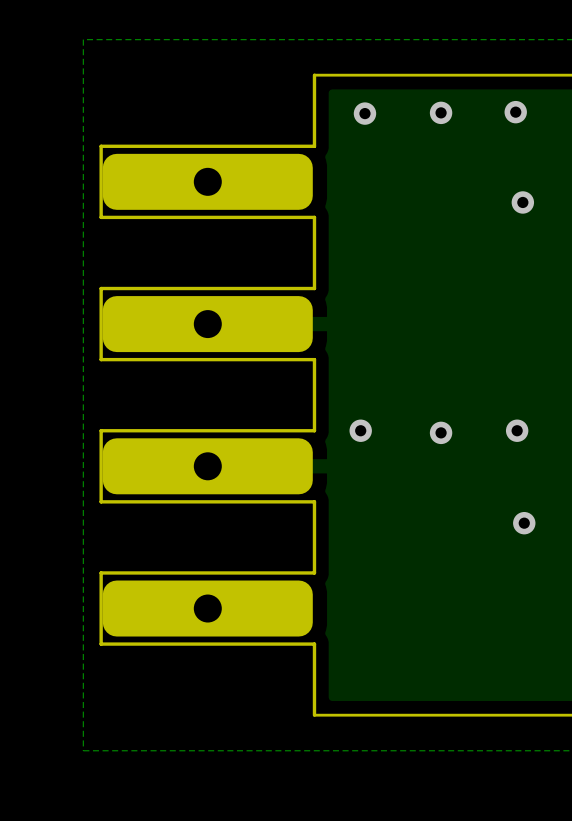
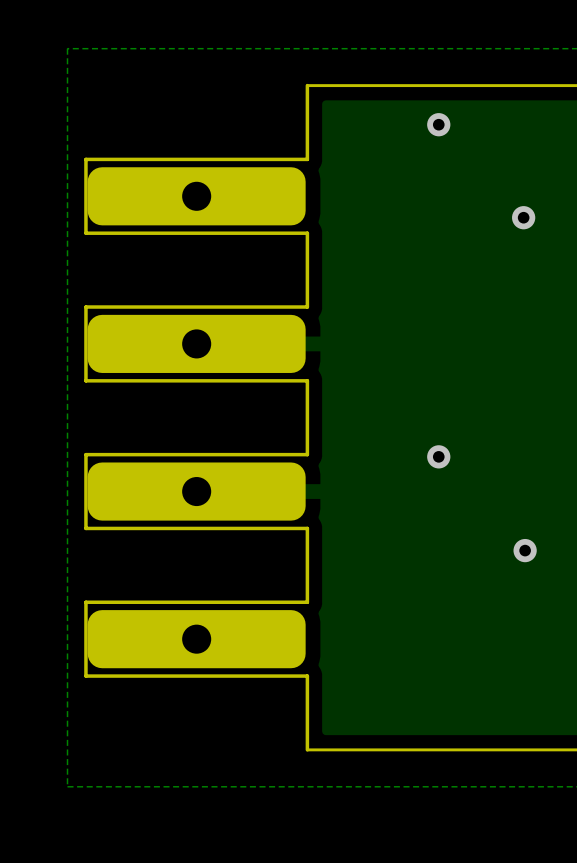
via: (515, 112) -> none
via: (364, 113) -> none
via: (360, 430) -> none
via: (517, 430) -> none

